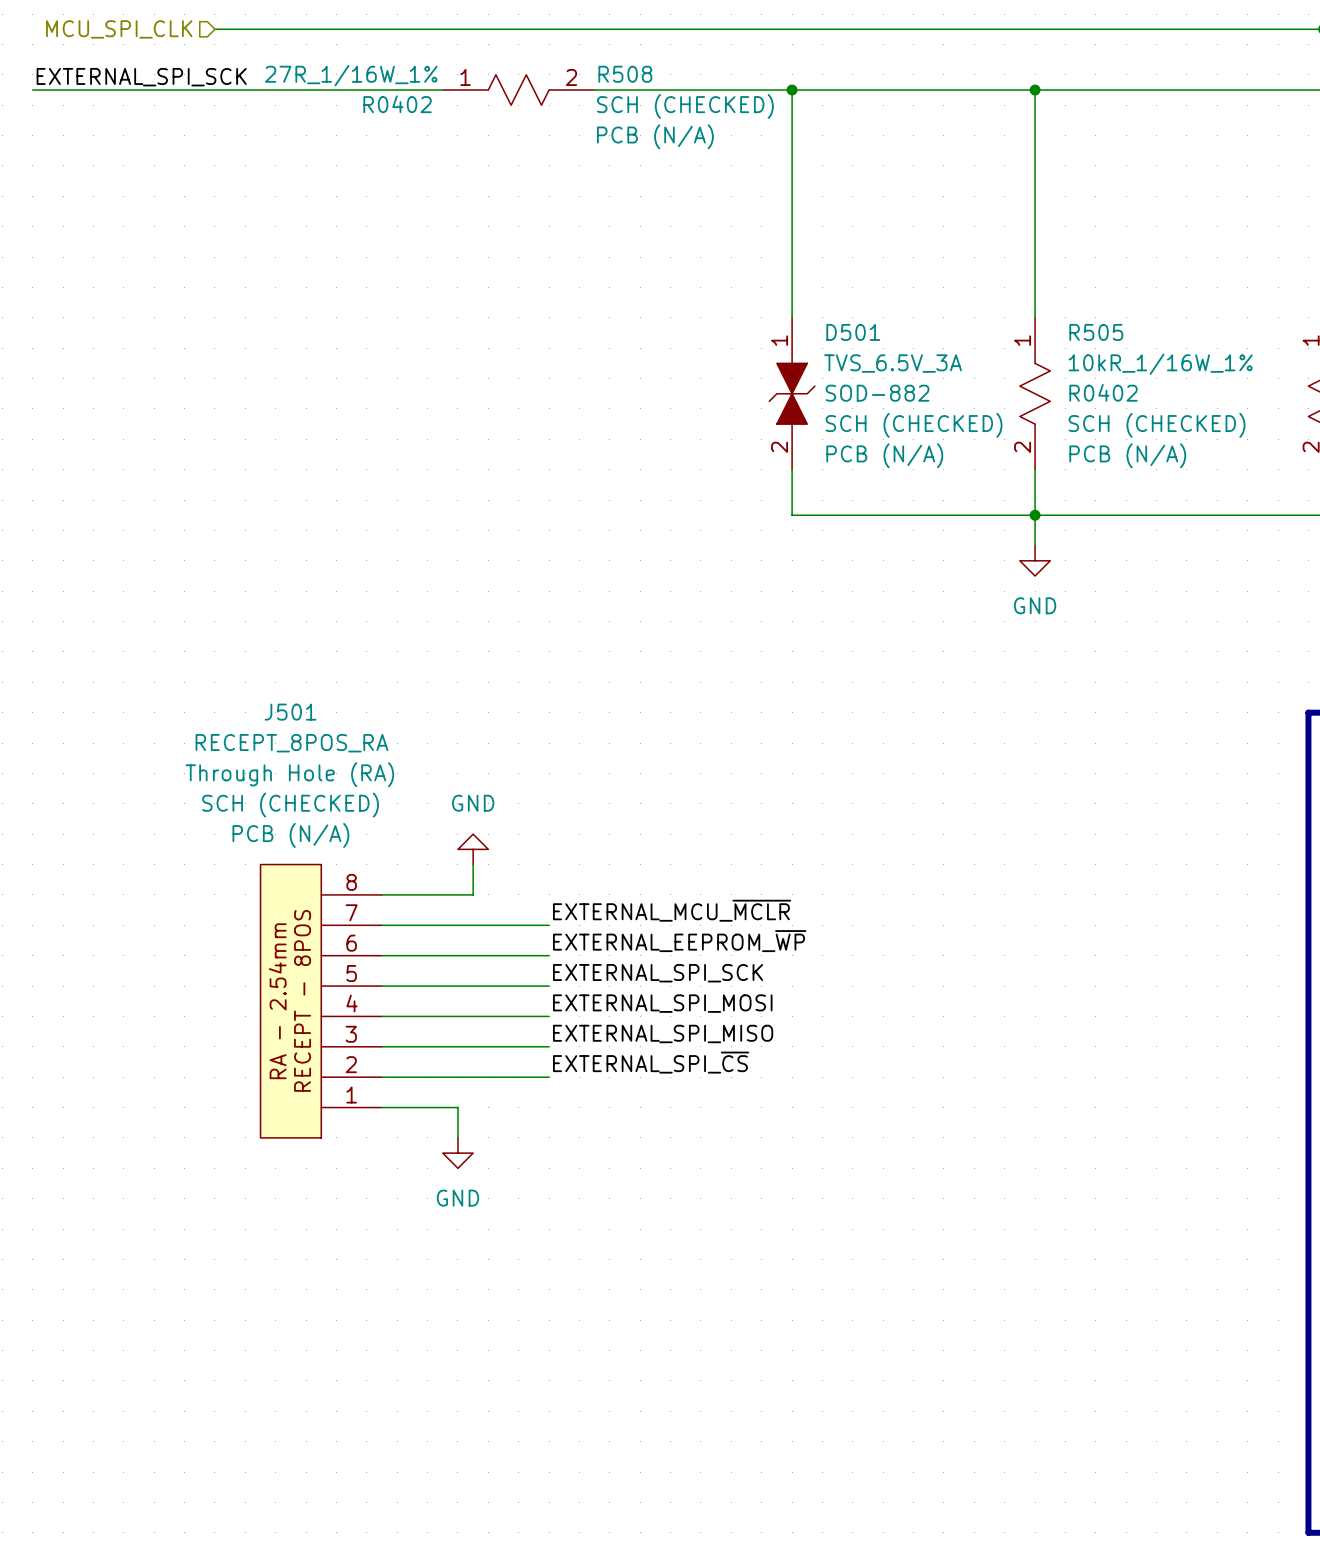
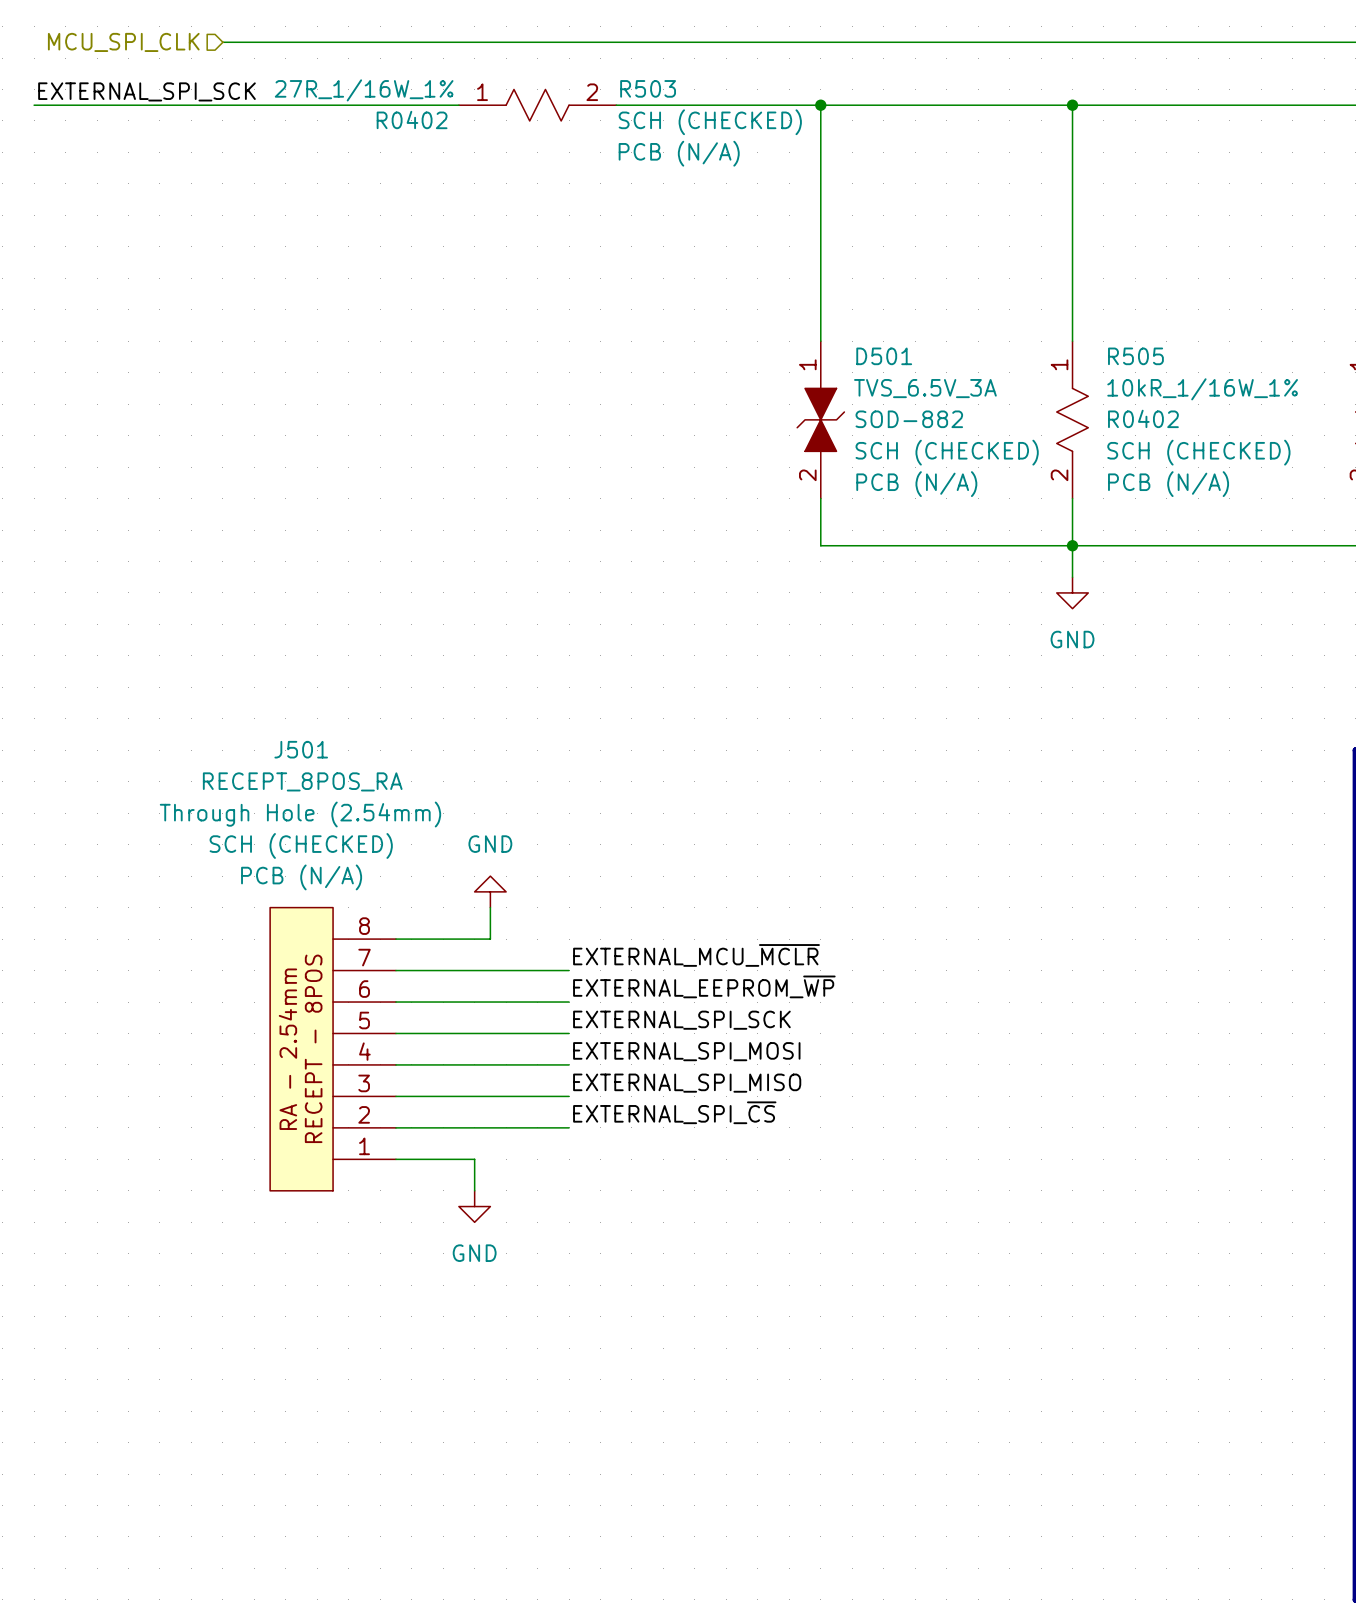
R508 name: R508 (625, 74) -> R503 (648, 88)
J501 text: Through Hole (RA) (289, 774) -> Through Hole (2.54mm) (300, 814)

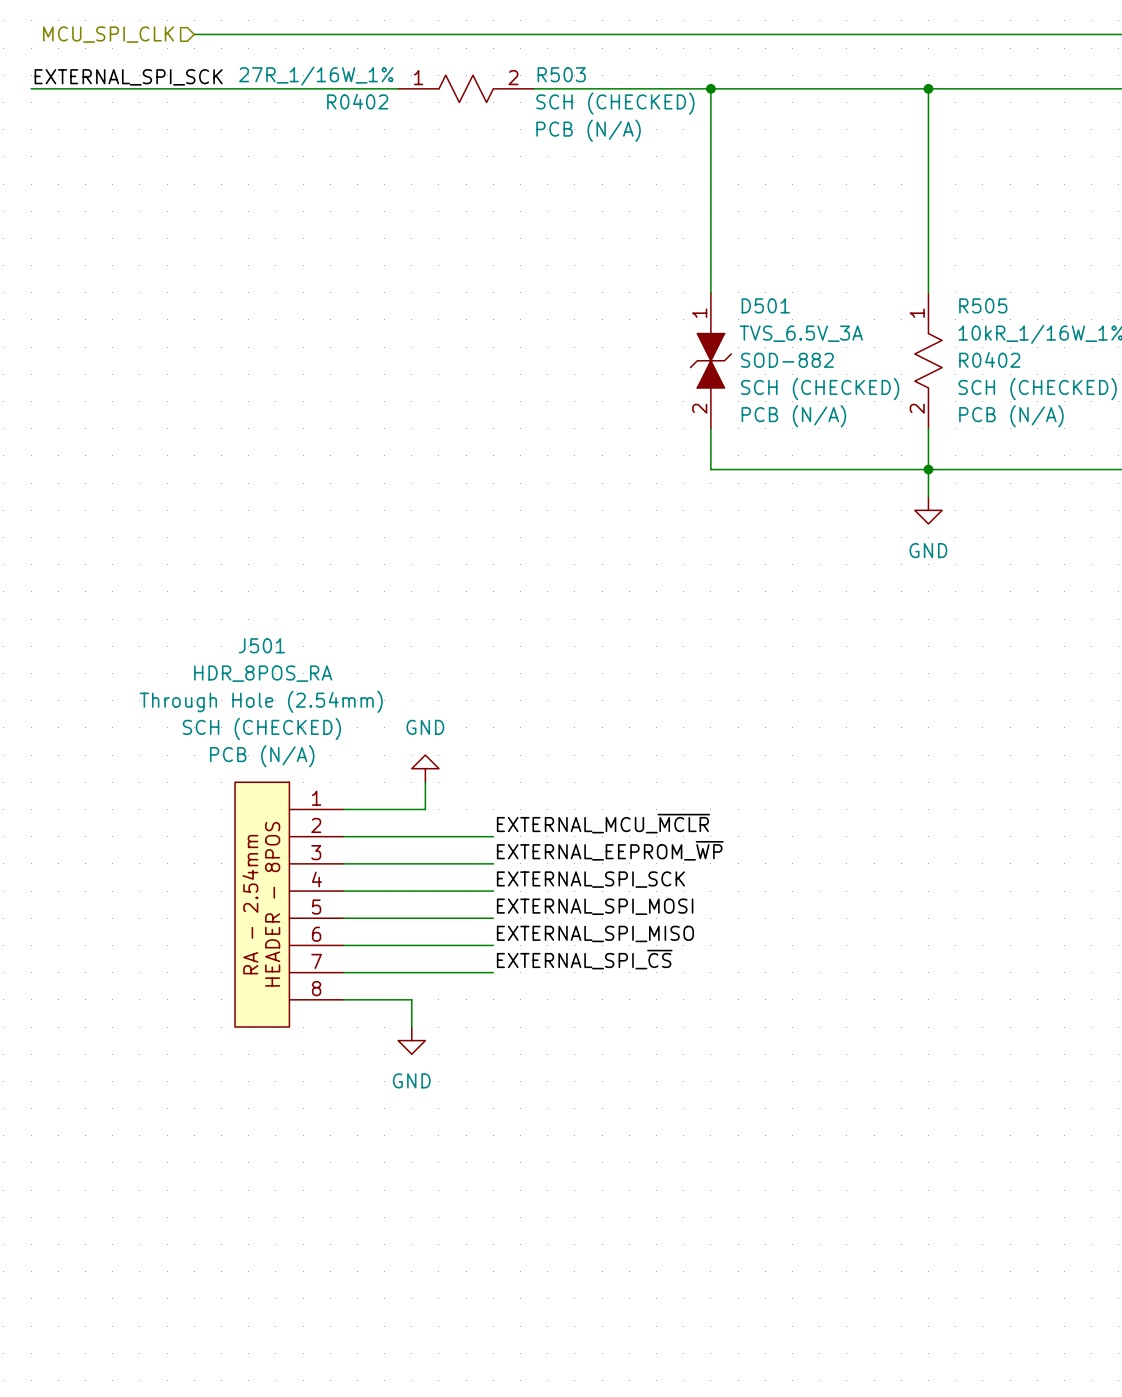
J501 value: RECEPT_8POS_RA (302, 781) -> HDR_8POS_RA (263, 673)
J501 symbol: [270, 907, 396, 1191] -> [235, 782, 344, 1028]

